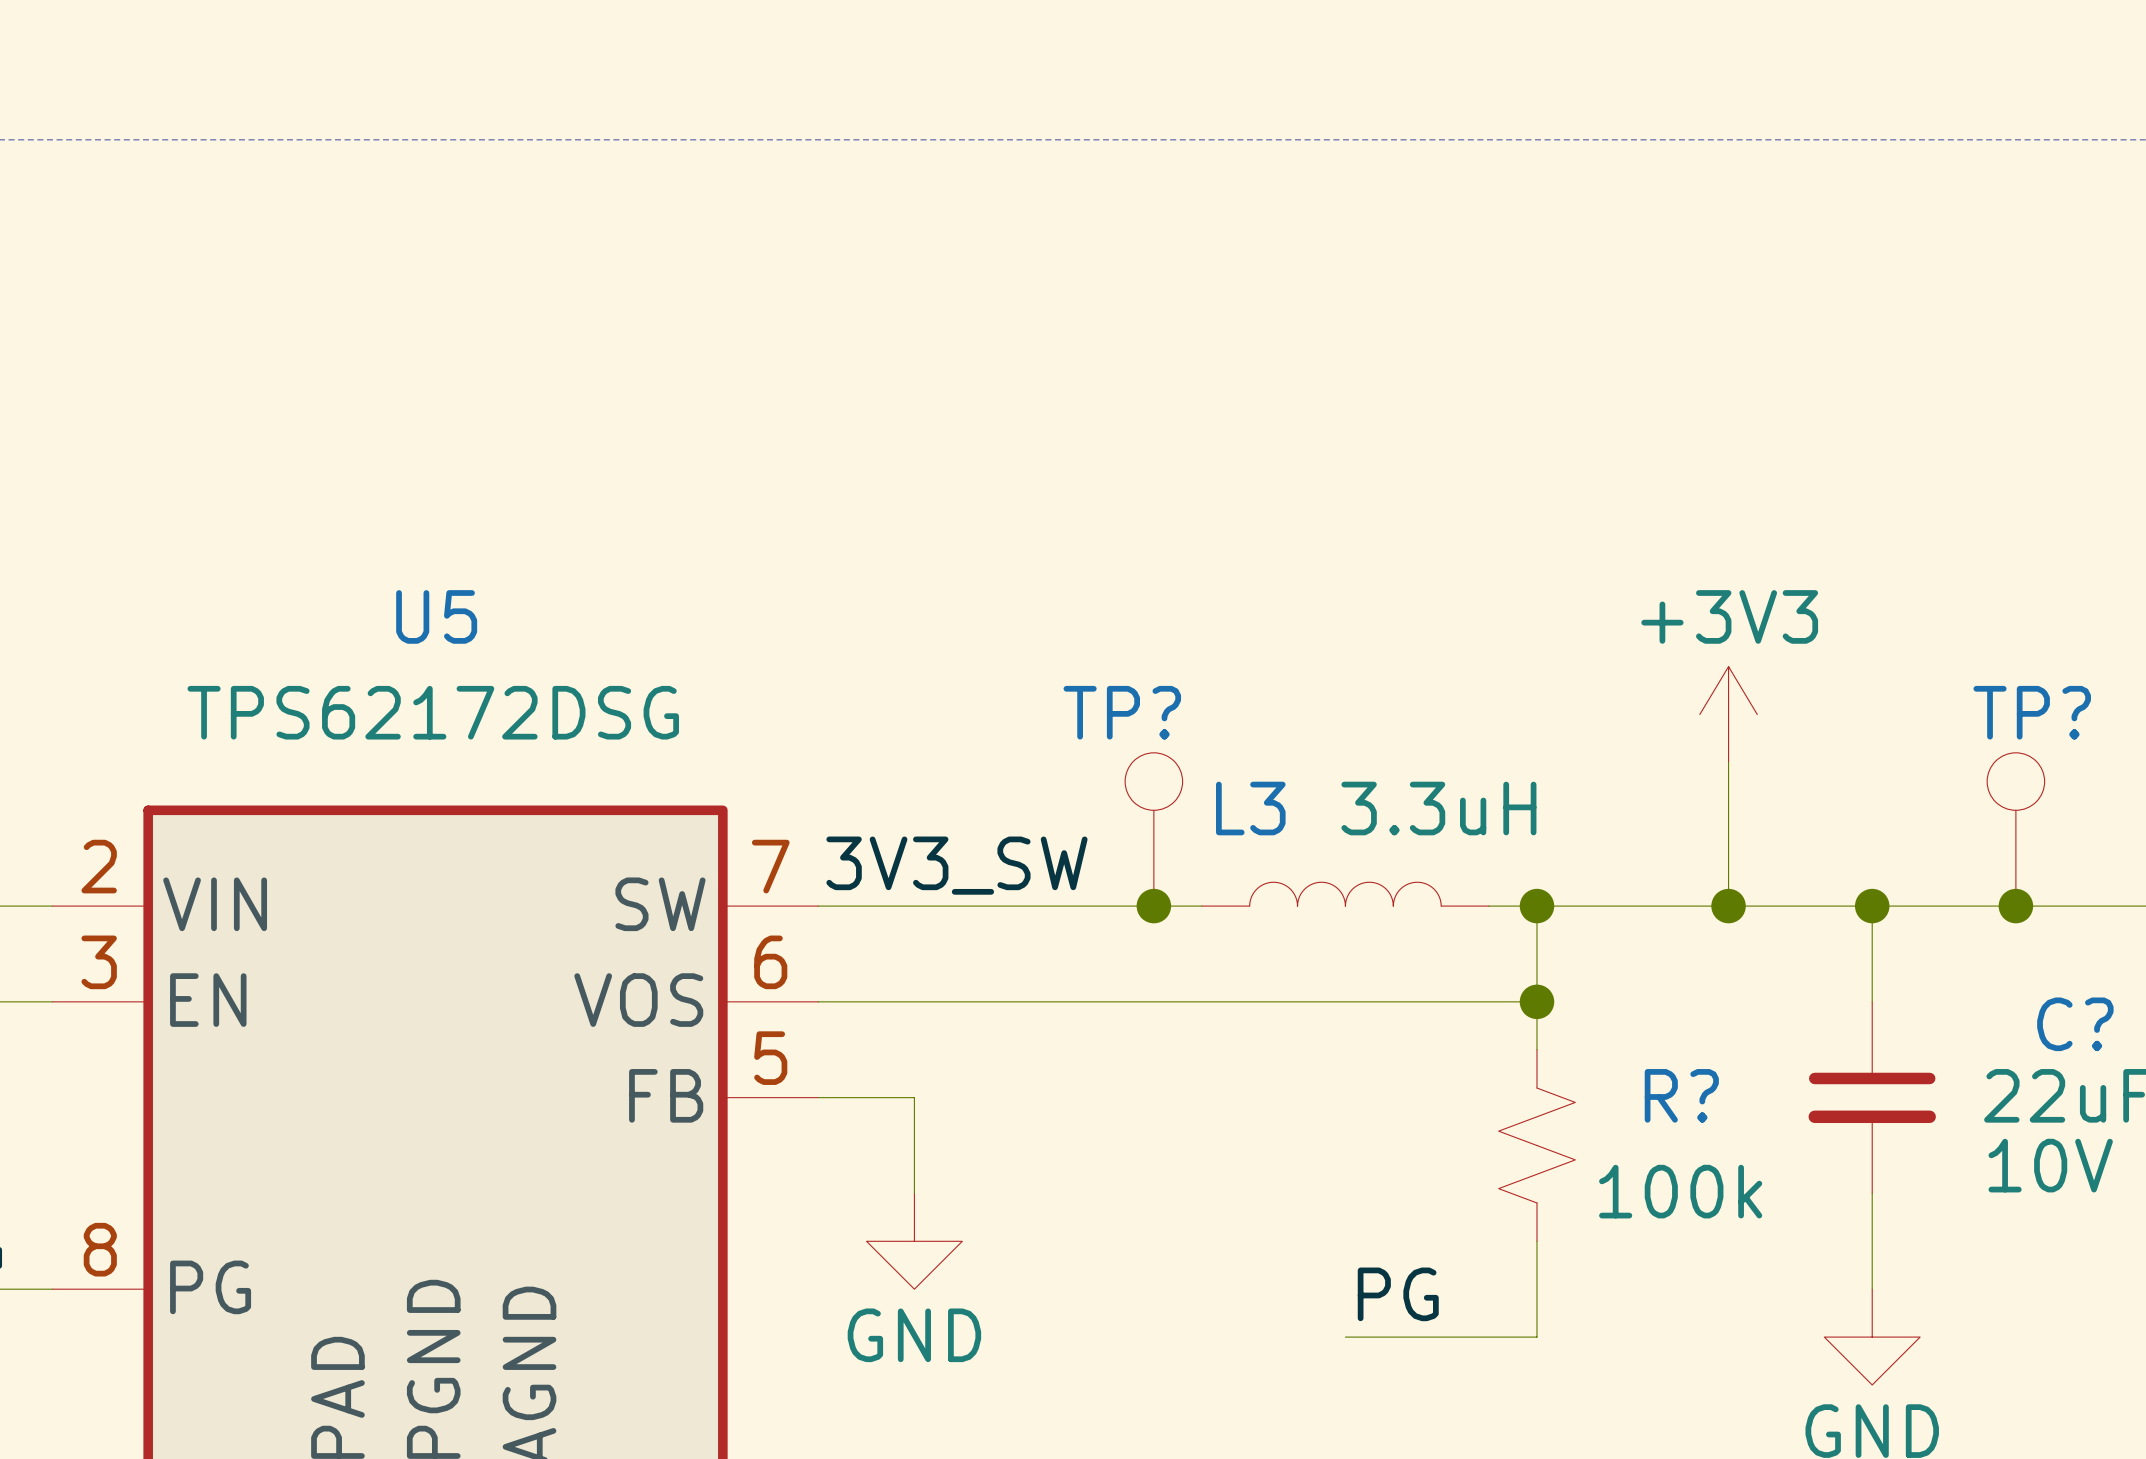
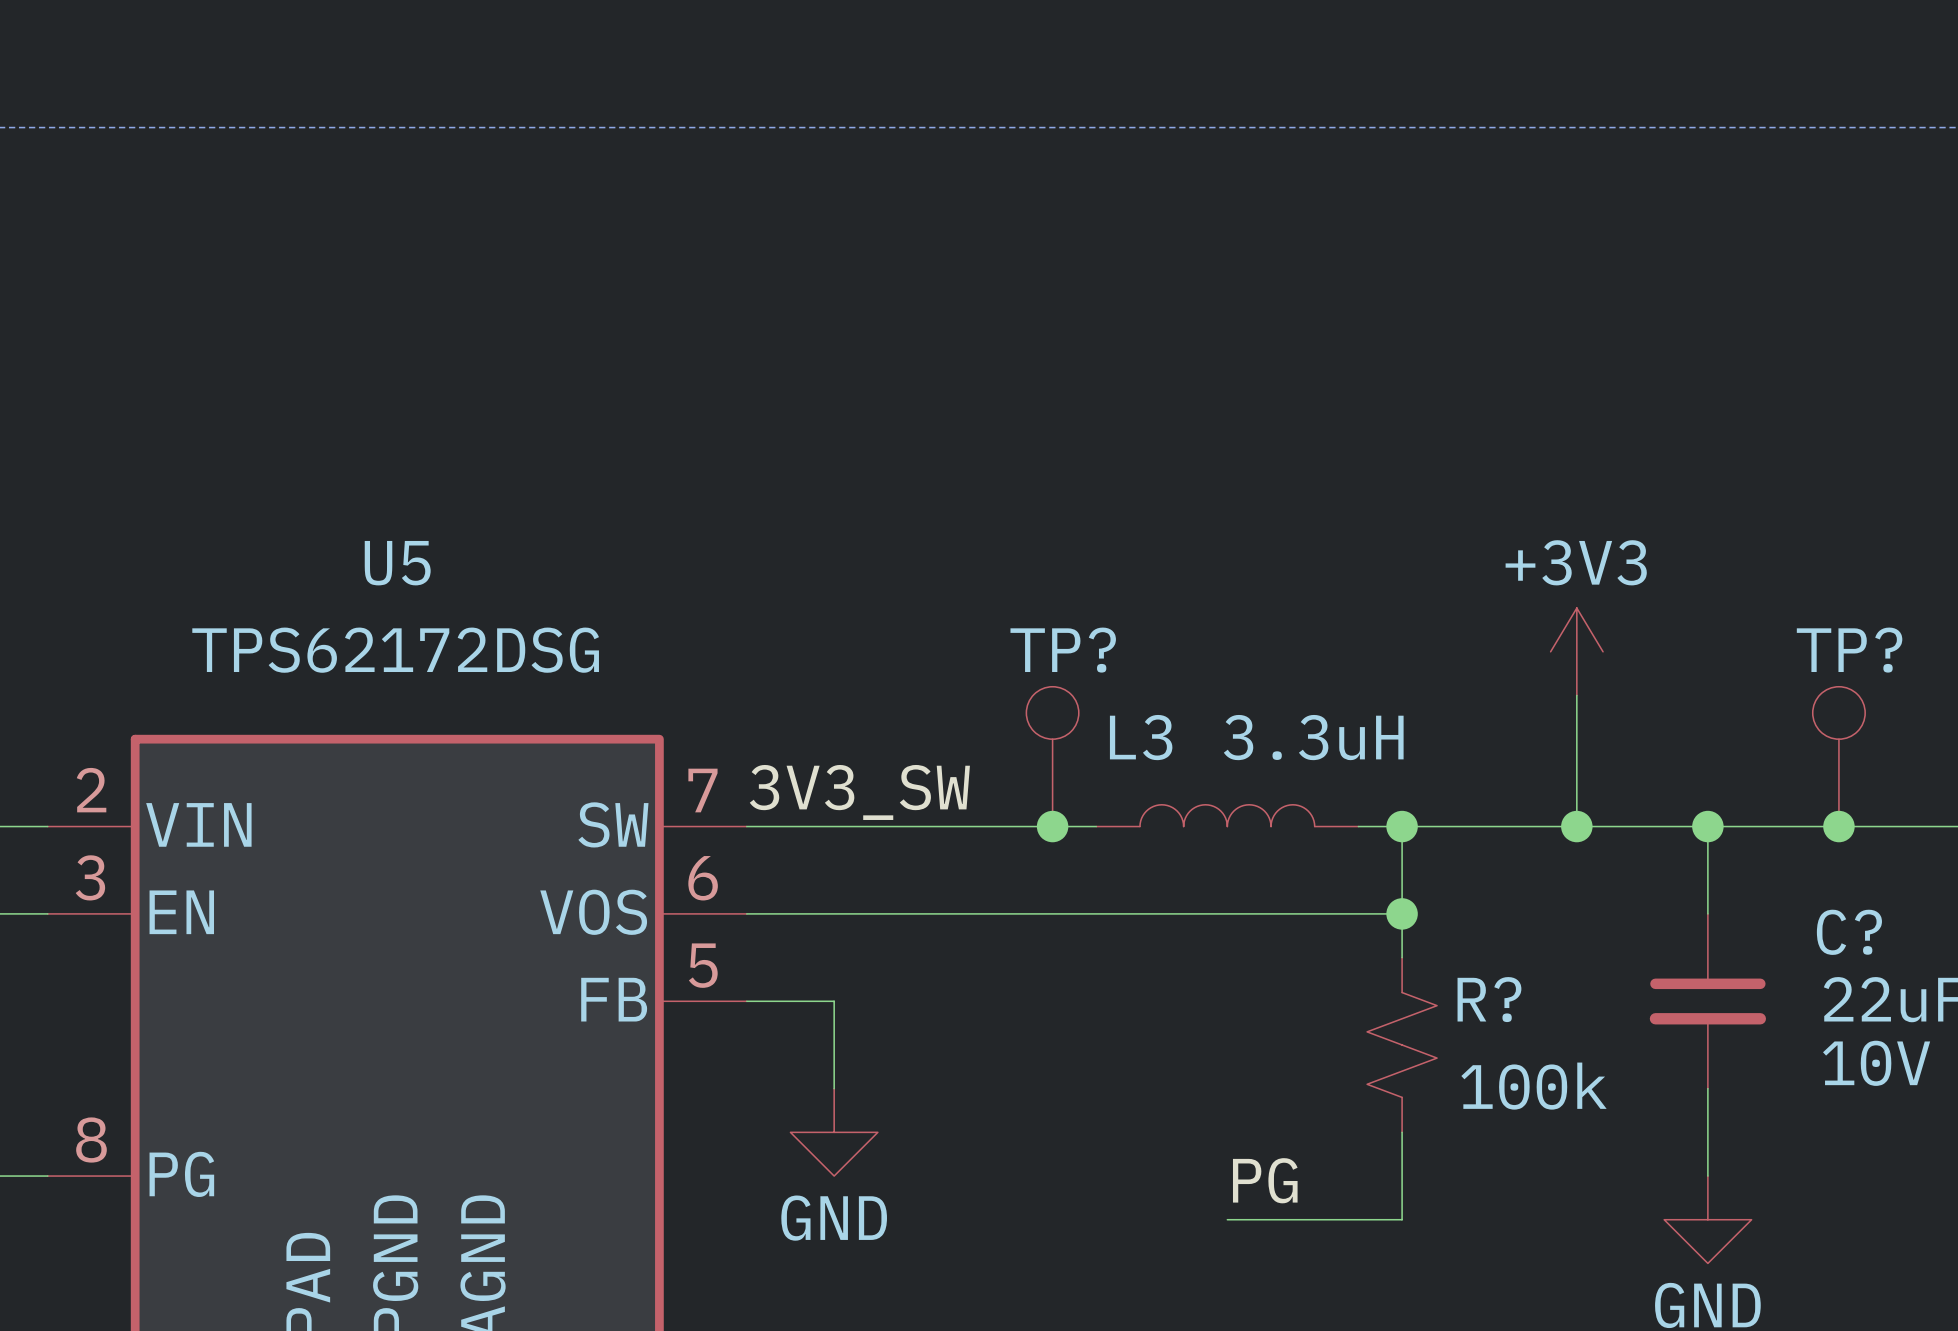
TP? name position: TP? (1122, 712) -> TP? (1063, 650)
C? name position: C? (2075, 1024) -> C? (1849, 932)
R? name position: R? (1681, 1095) -> R? (1489, 999)

